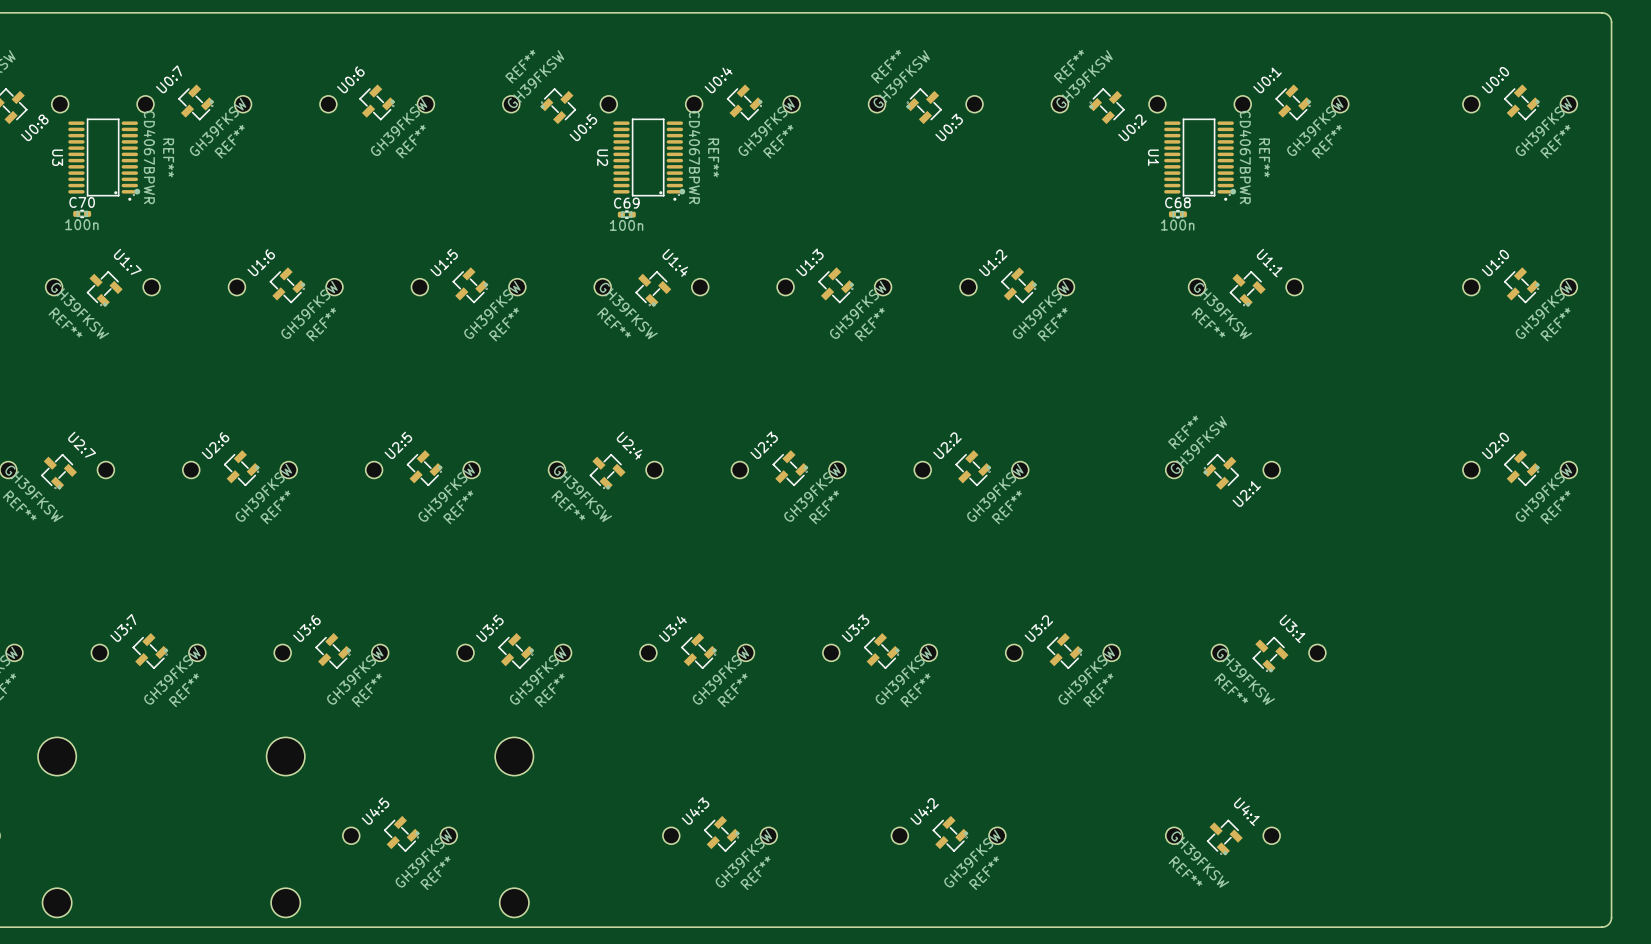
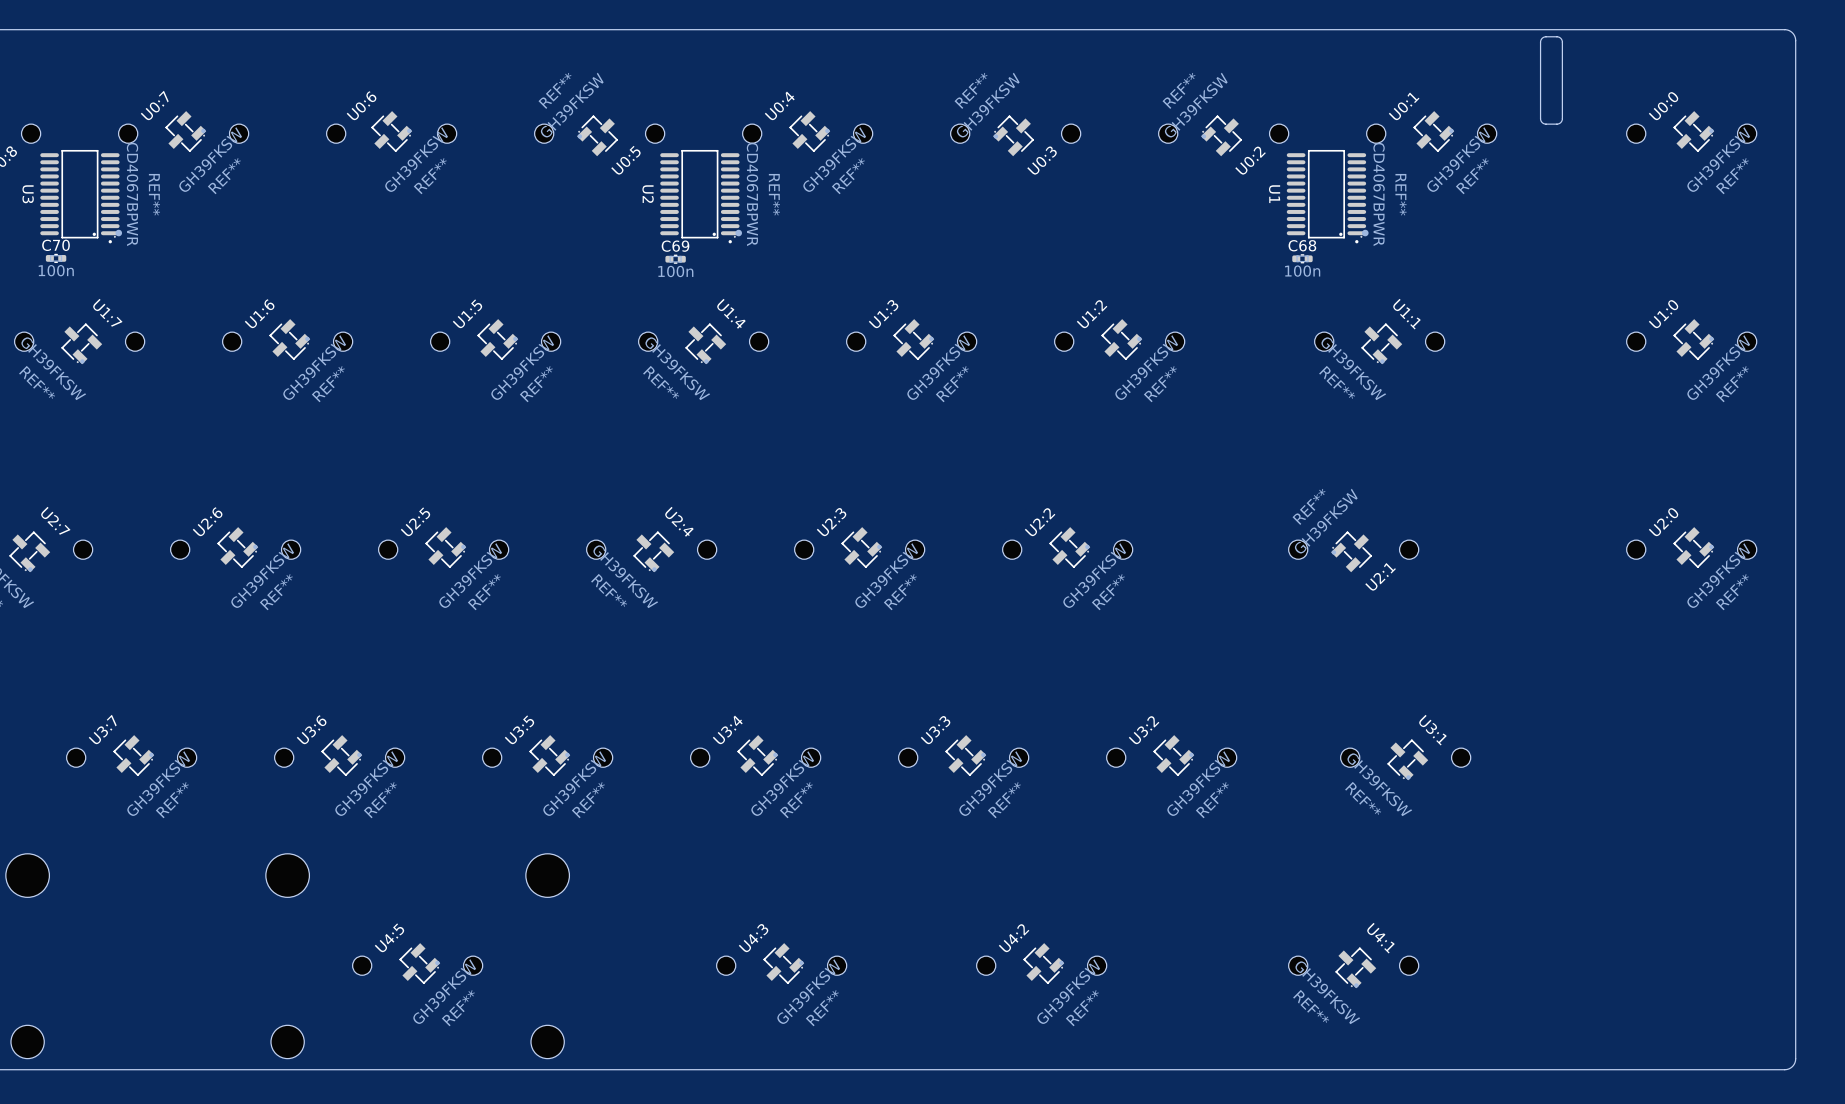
board edge: none -> (1556, 36) (1544, 36) (1540, 41) (1540, 118) (1545, 124) (1558, 123) (1562, 119) (1562, 42) (1560, 38) (1556, 36)

